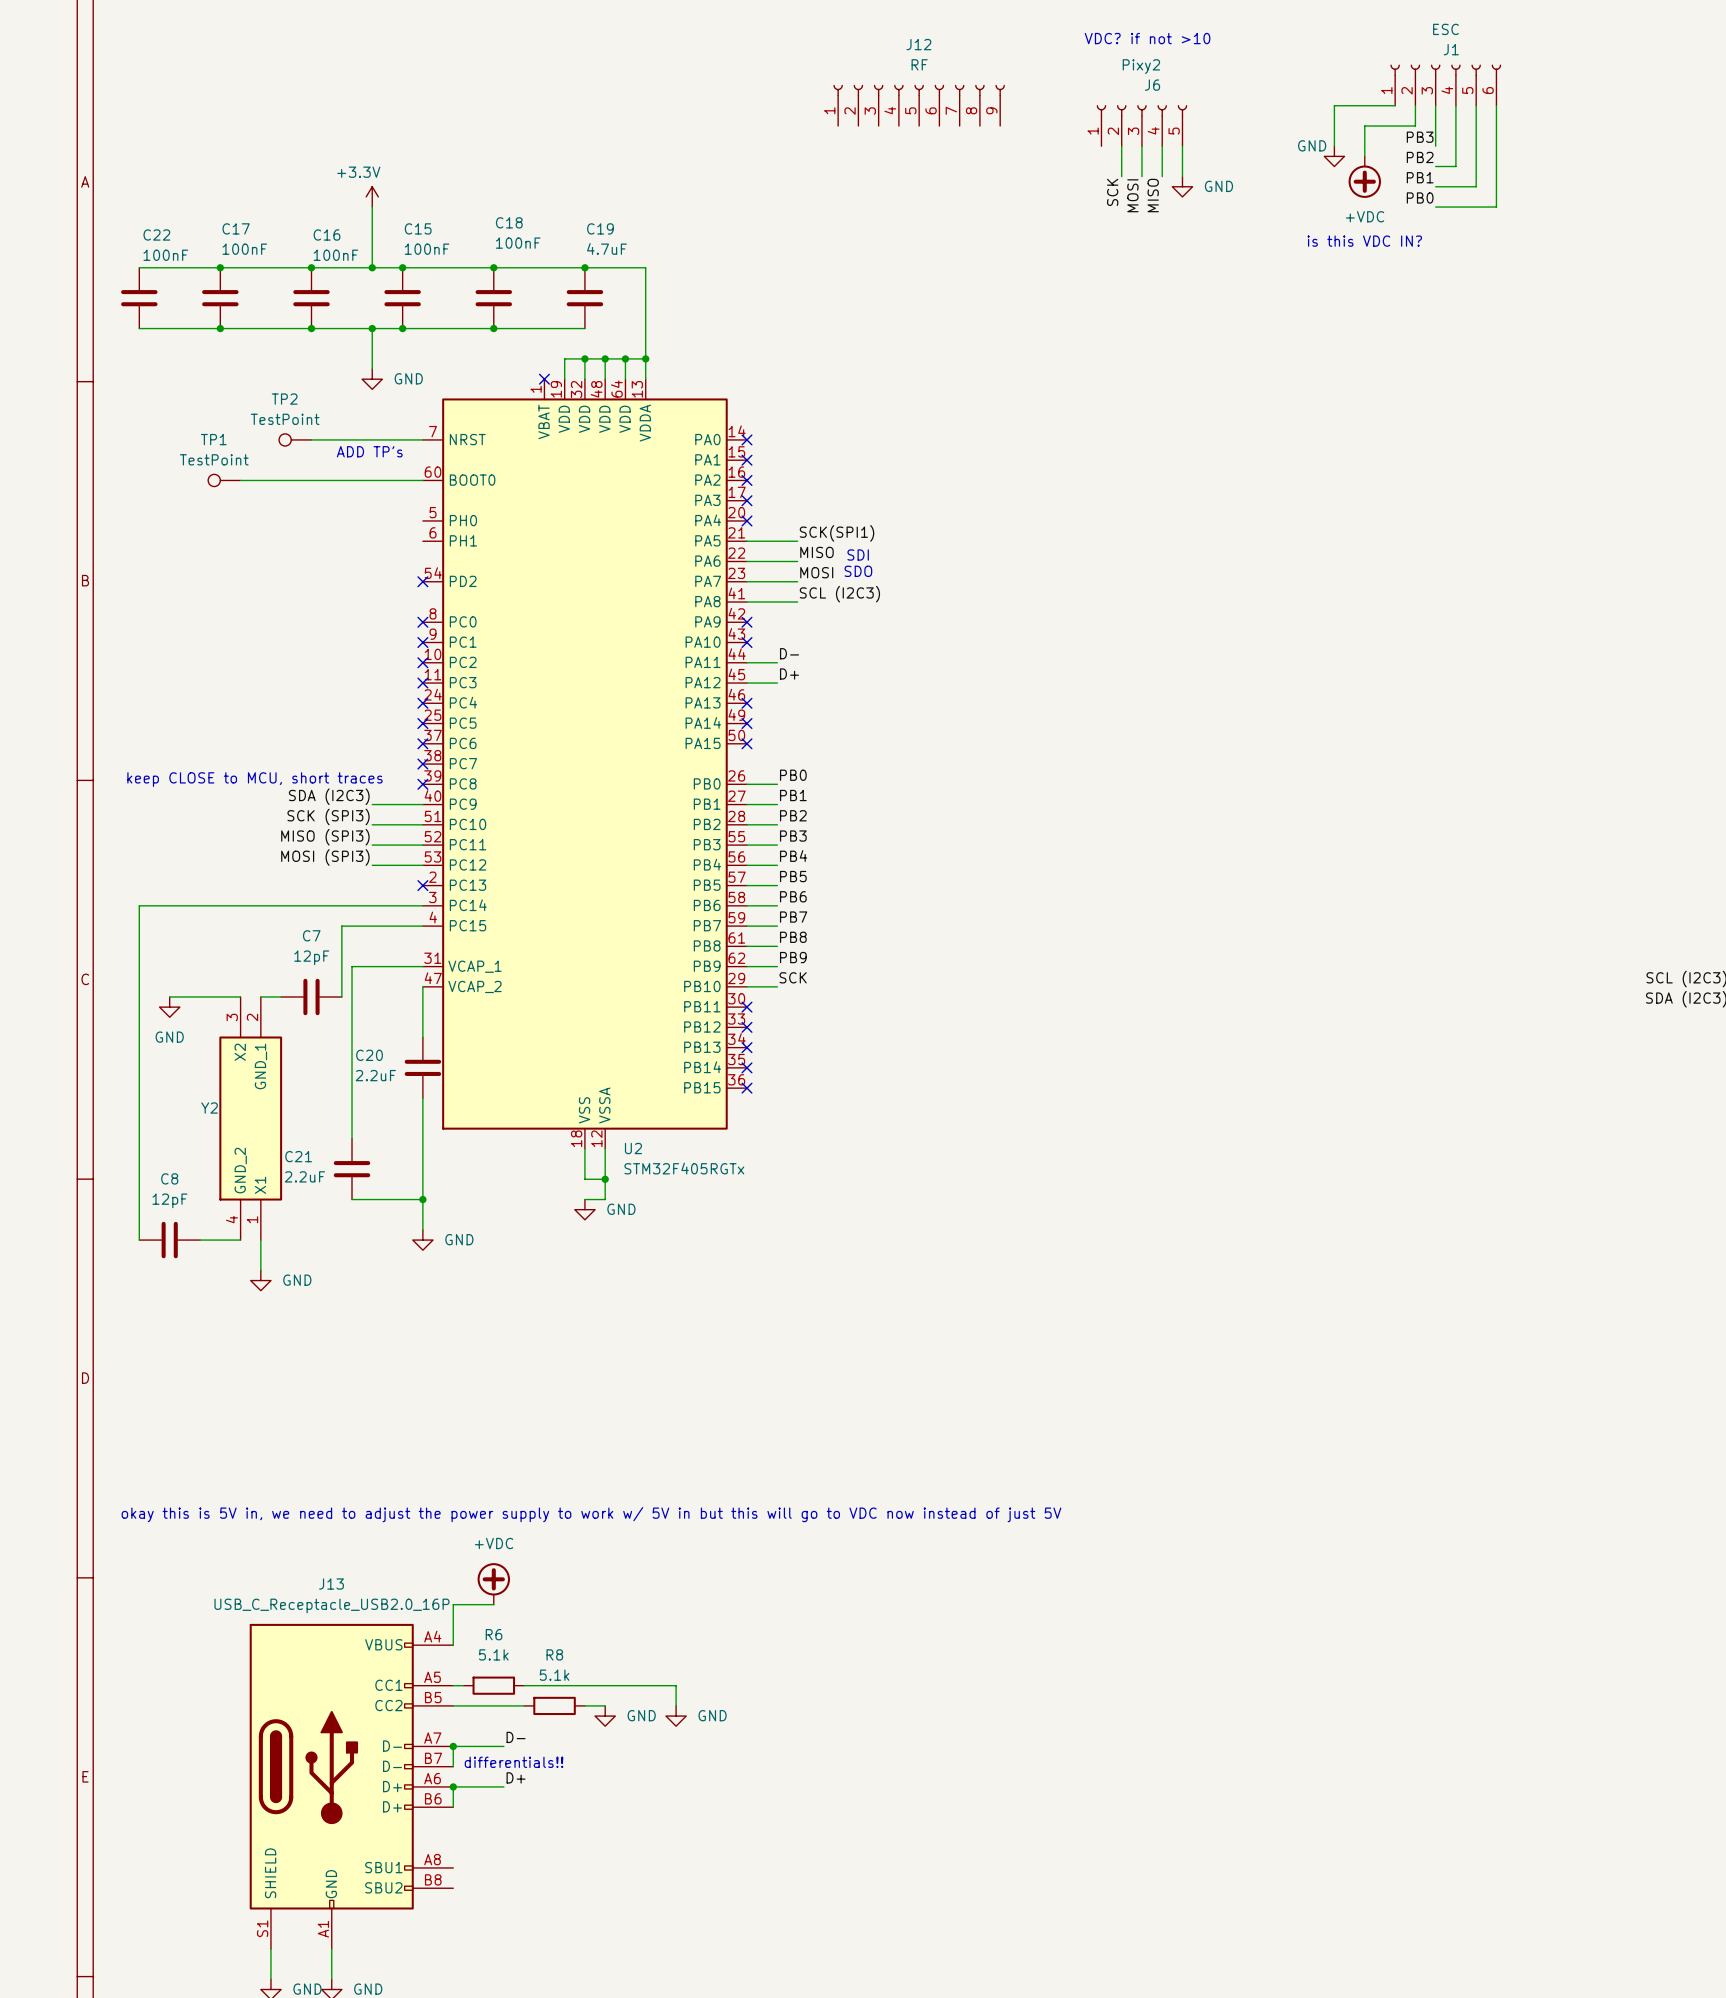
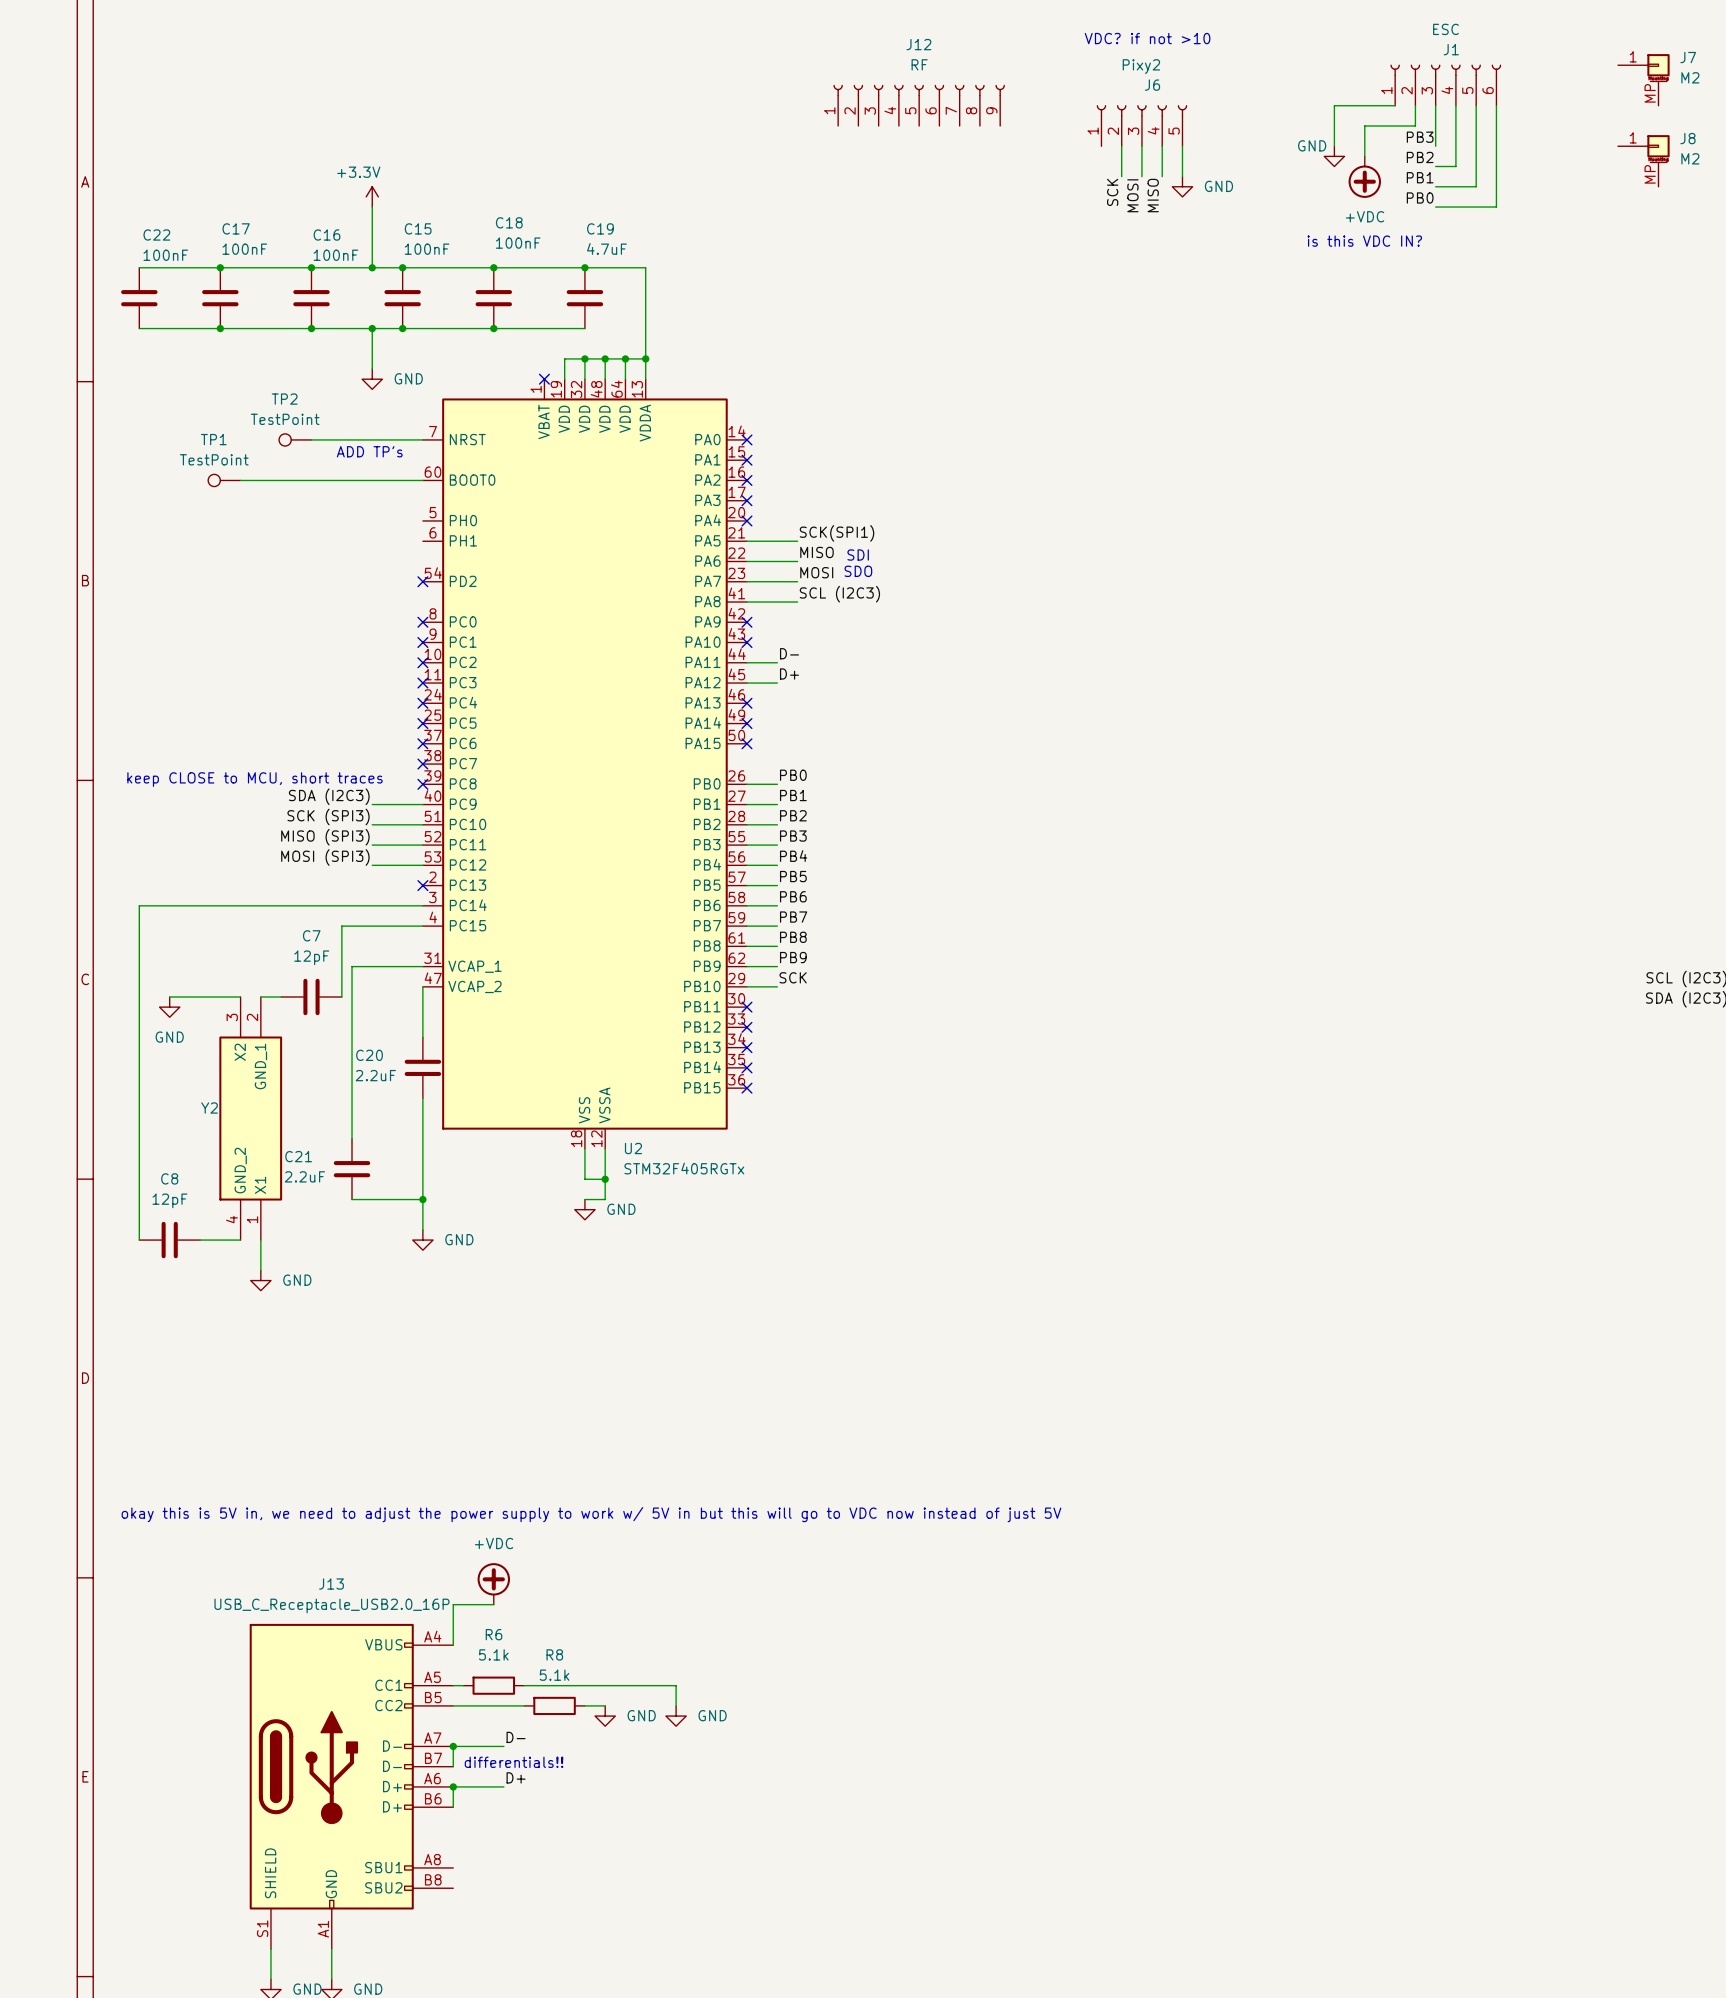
J7: none -> M2 (1643, 79)
J8: none -> M2 (1643, 160)

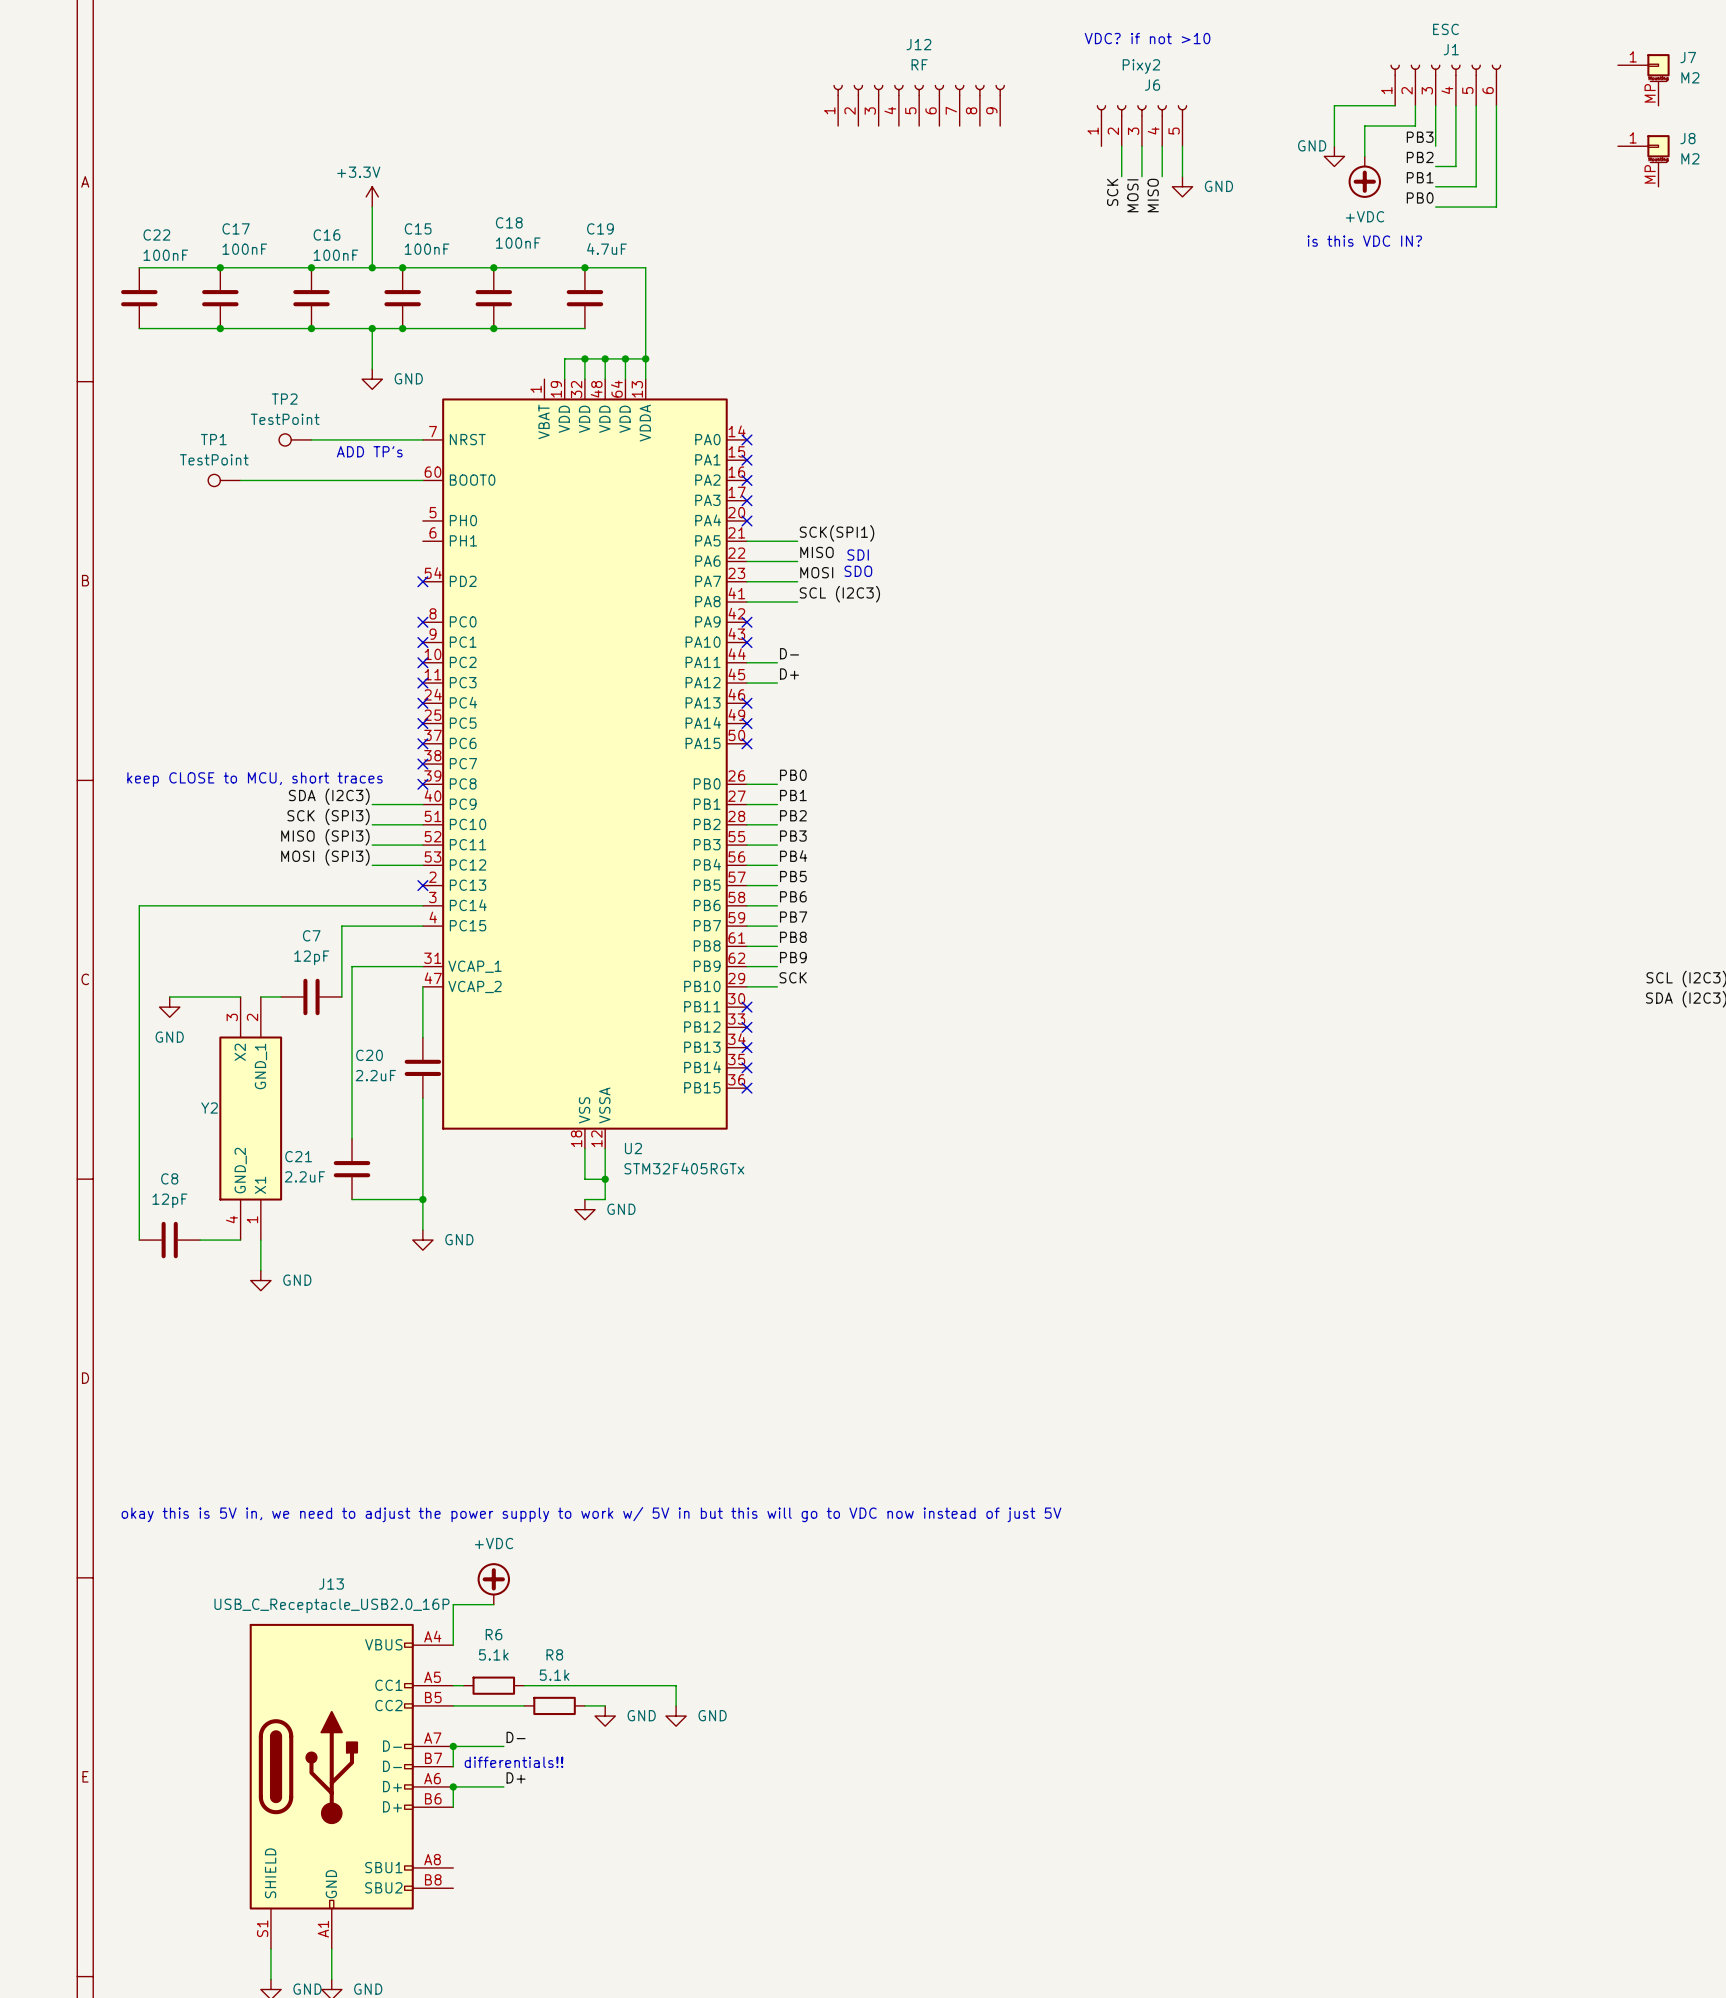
no-connect mark: (544, 379) -> none

